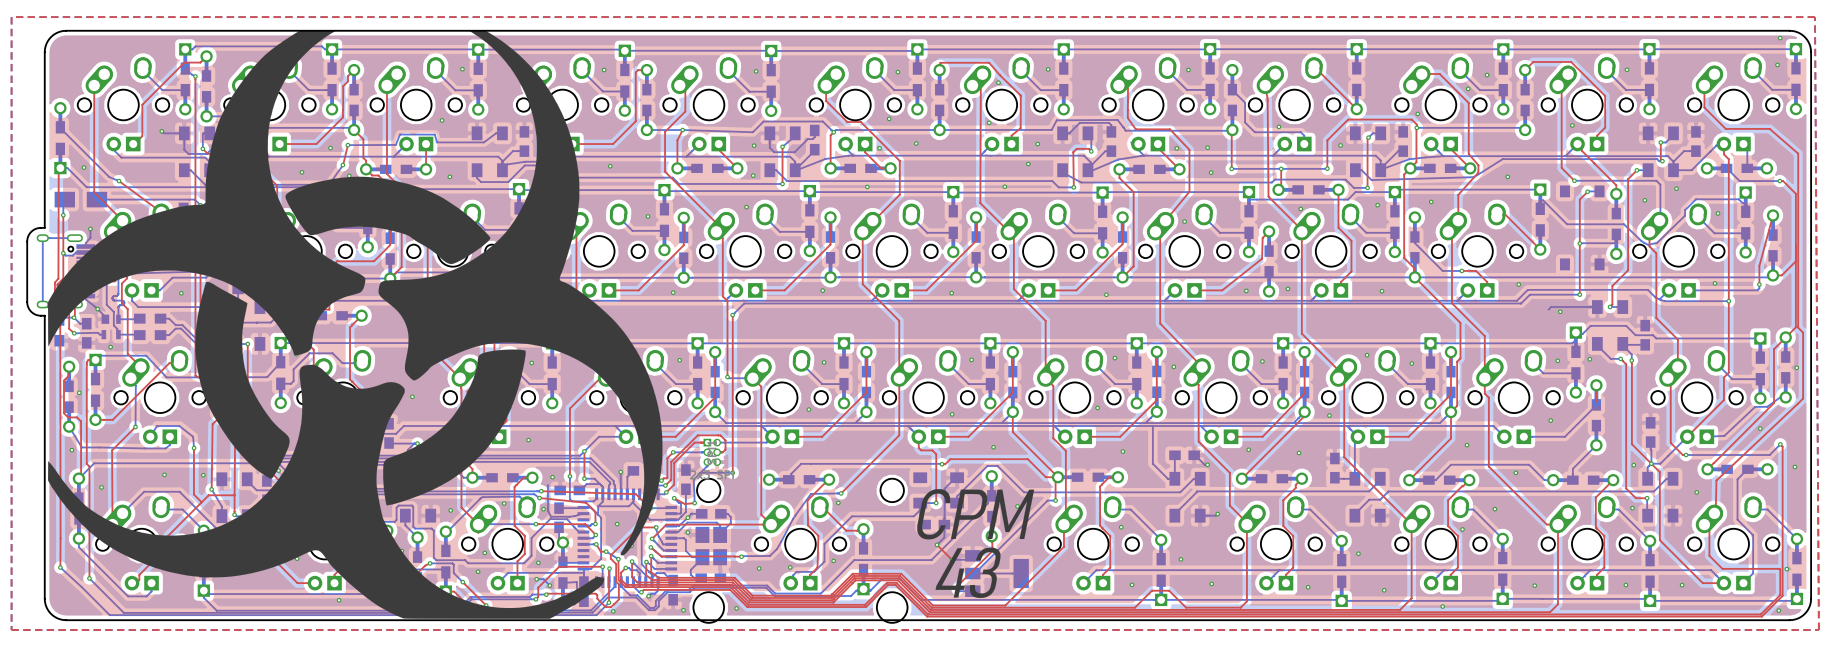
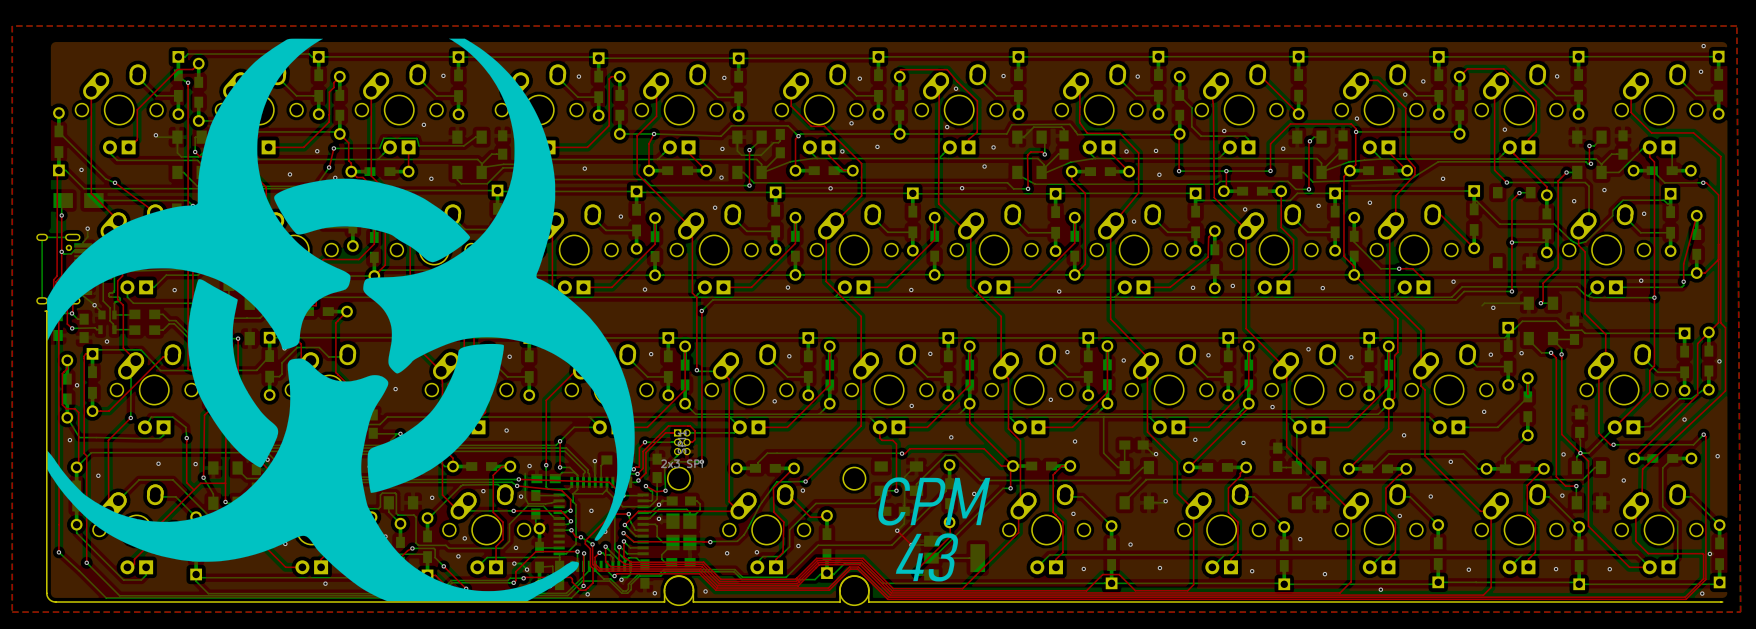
board edge: (66, 30) (1795, 31) (1806, 39) (1811, 52) (1810, 604) (1802, 615) (1789, 620) (60, 619) (51, 613) (44, 601) (44, 315) (34, 313) (27, 305) (27, 241) (32, 230) (44, 227) (44, 49) (51, 37) (58, 32) (66, 30) -> none
board edge: none -> (45, 311) (46, 311) (46, 593) (52, 601) (664, 602) (666, 584) (670, 578) (678, 576) (688, 579) (693, 590)
board edge: none -> (693, 590) (693, 602) (840, 602)
board edge: none -> (840, 602) (841, 583) (847, 577) (854, 576) (862, 578) (867, 583) (868, 602) (1722, 602)

